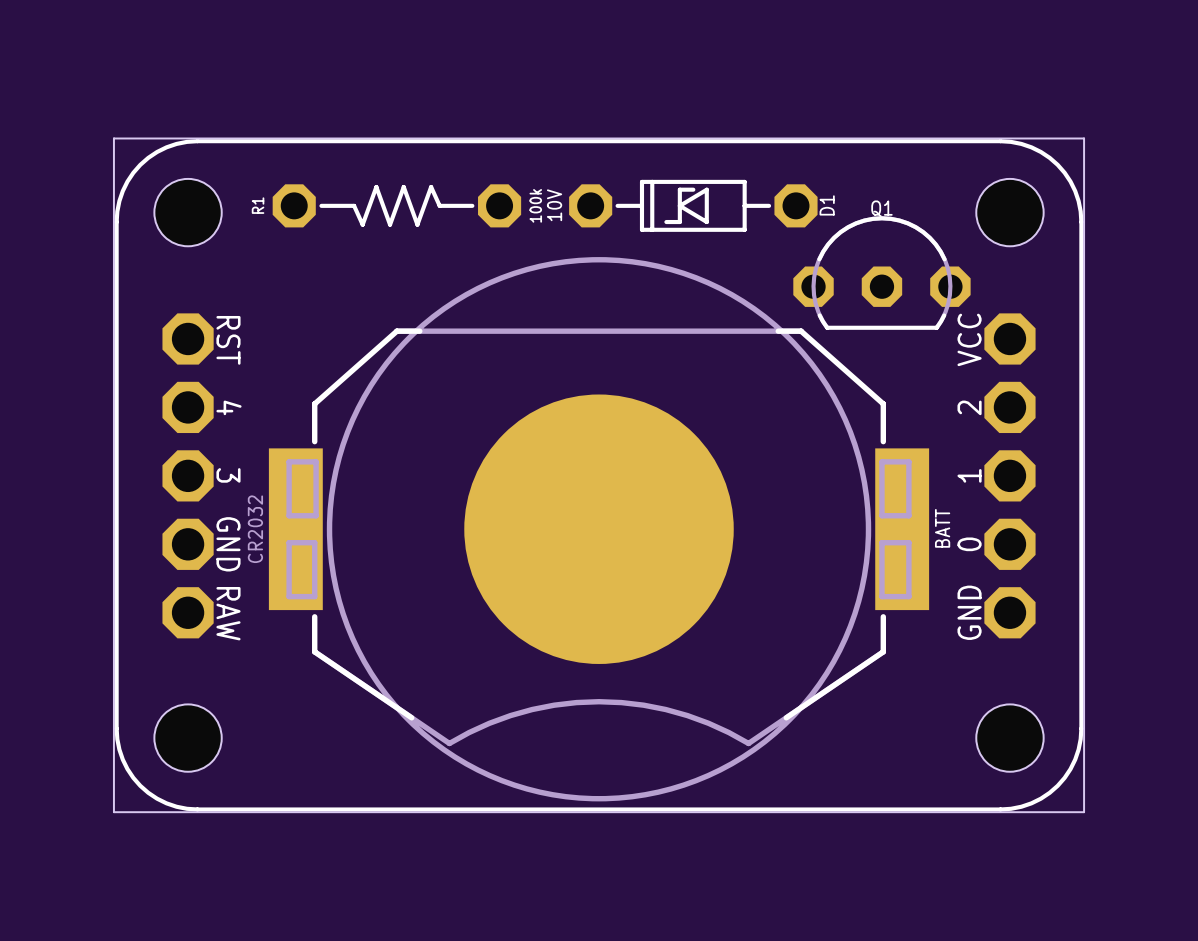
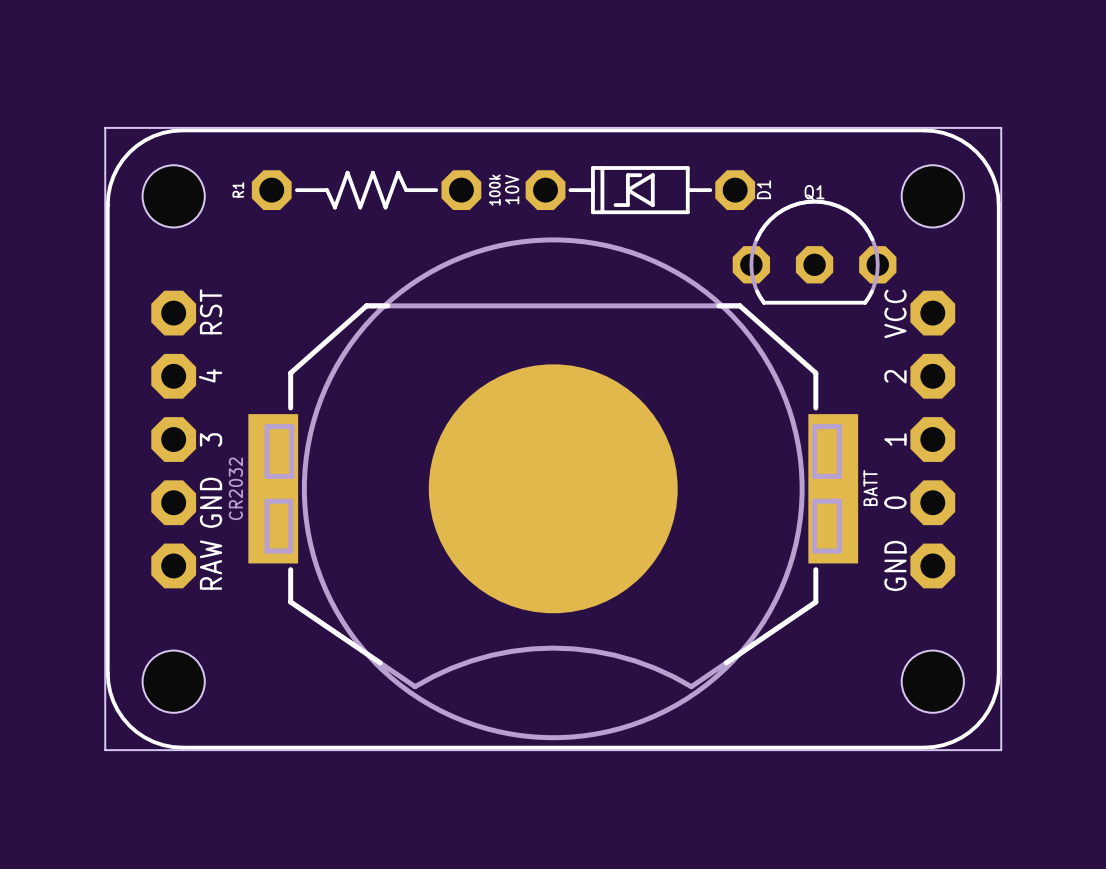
part footprint: [114, 139, 1084, 812] -> [105, 128, 1001, 750]

